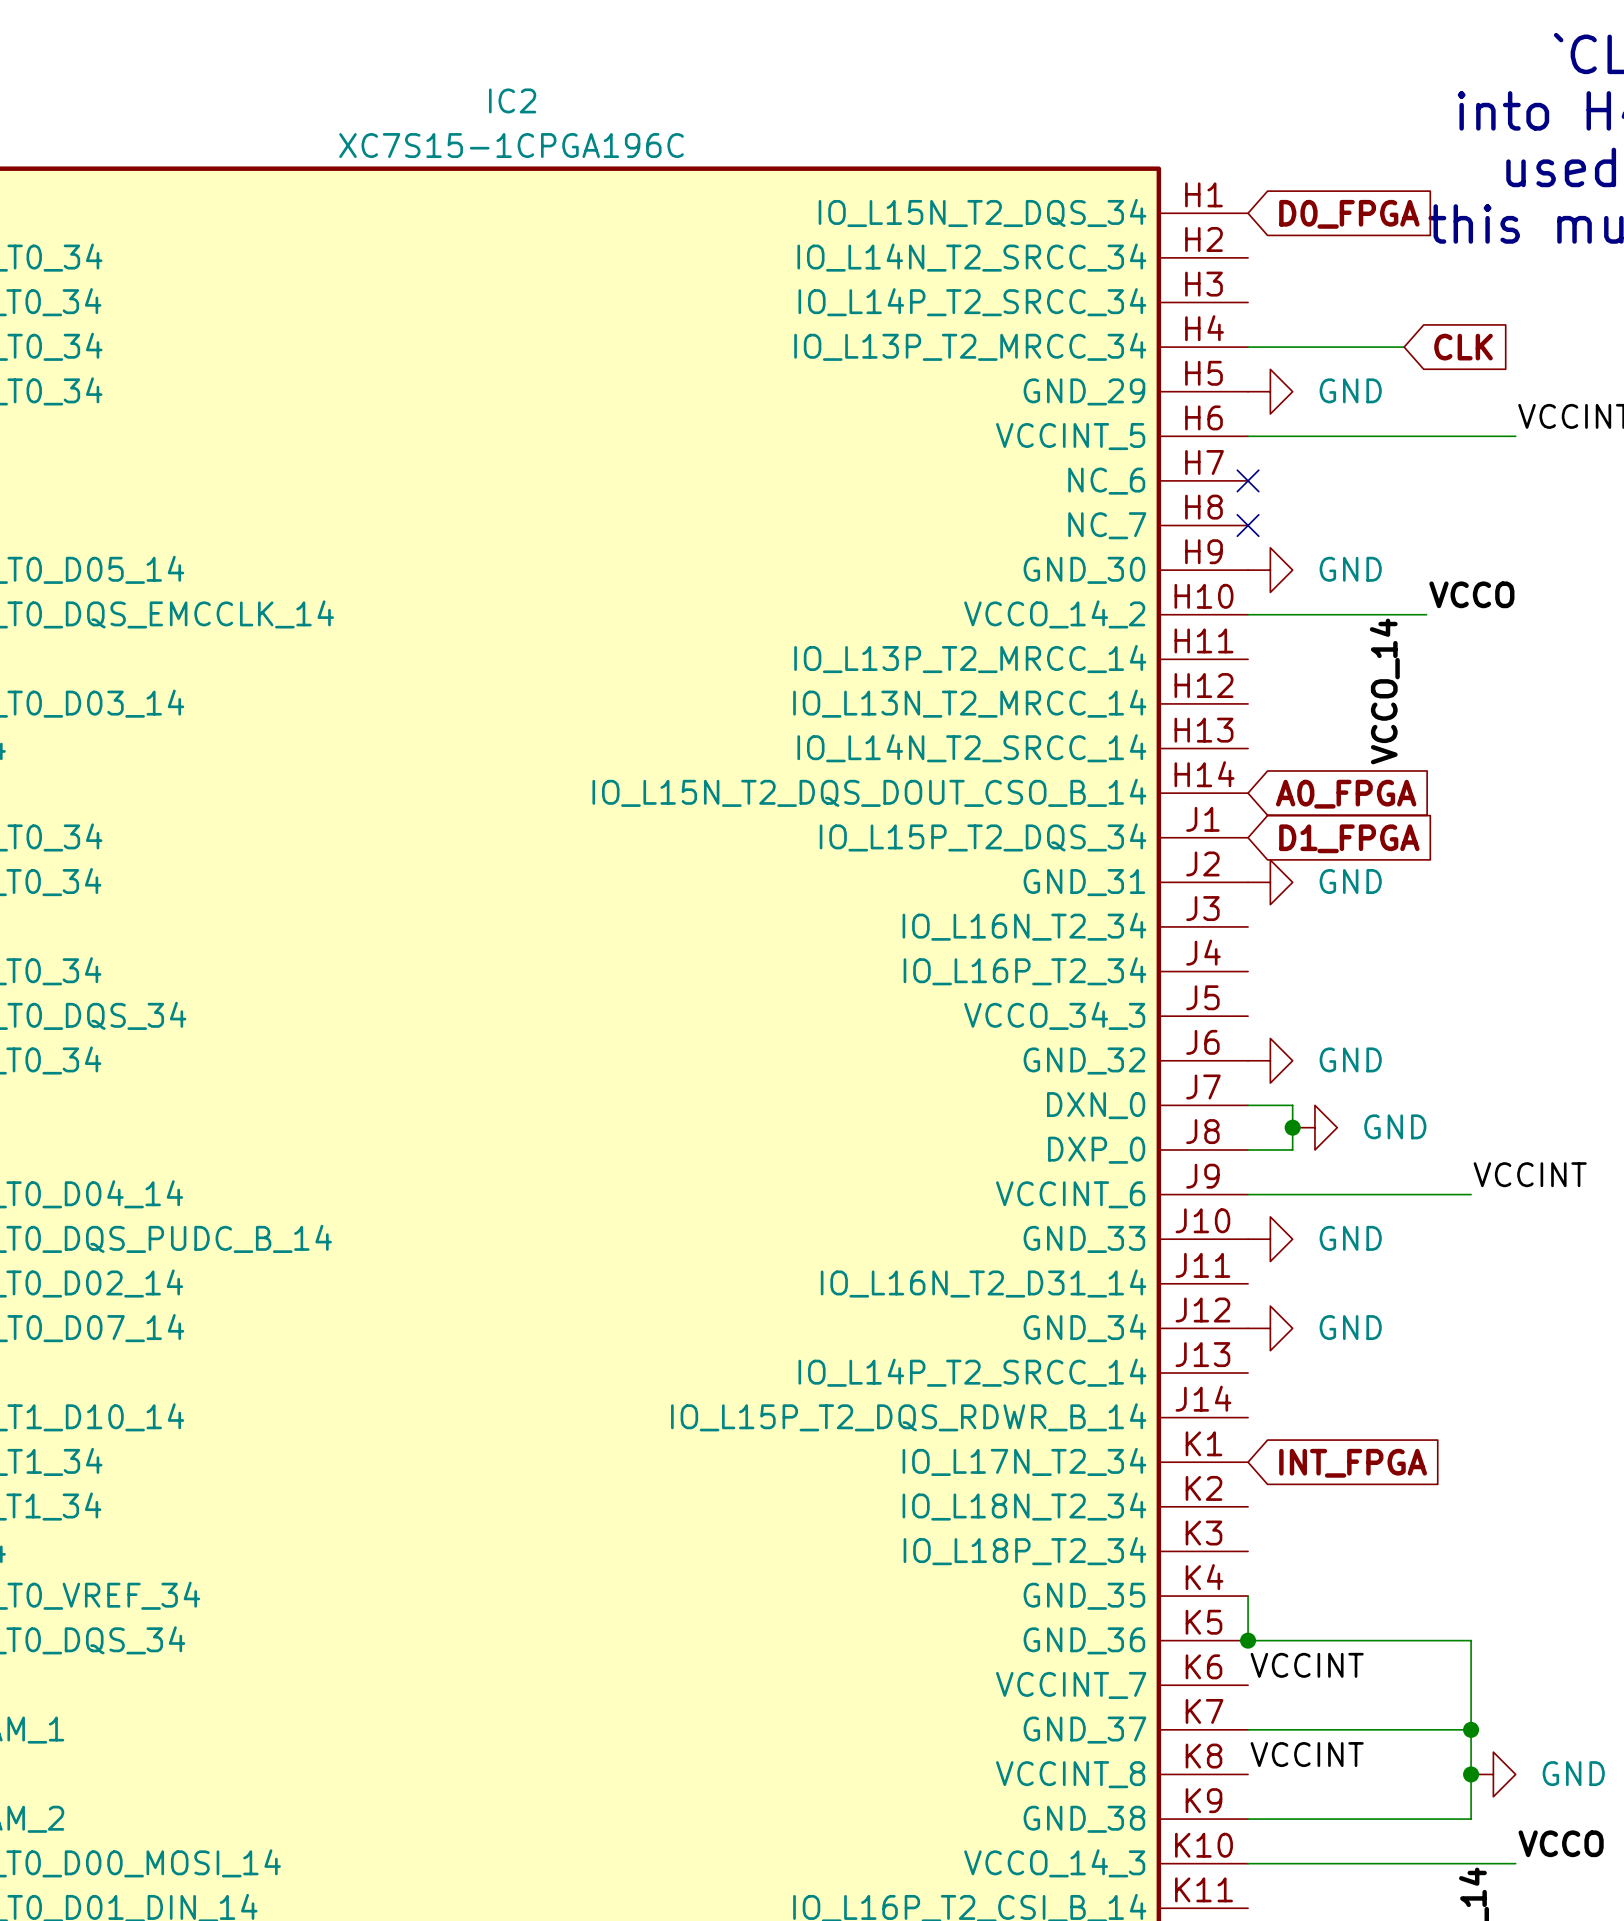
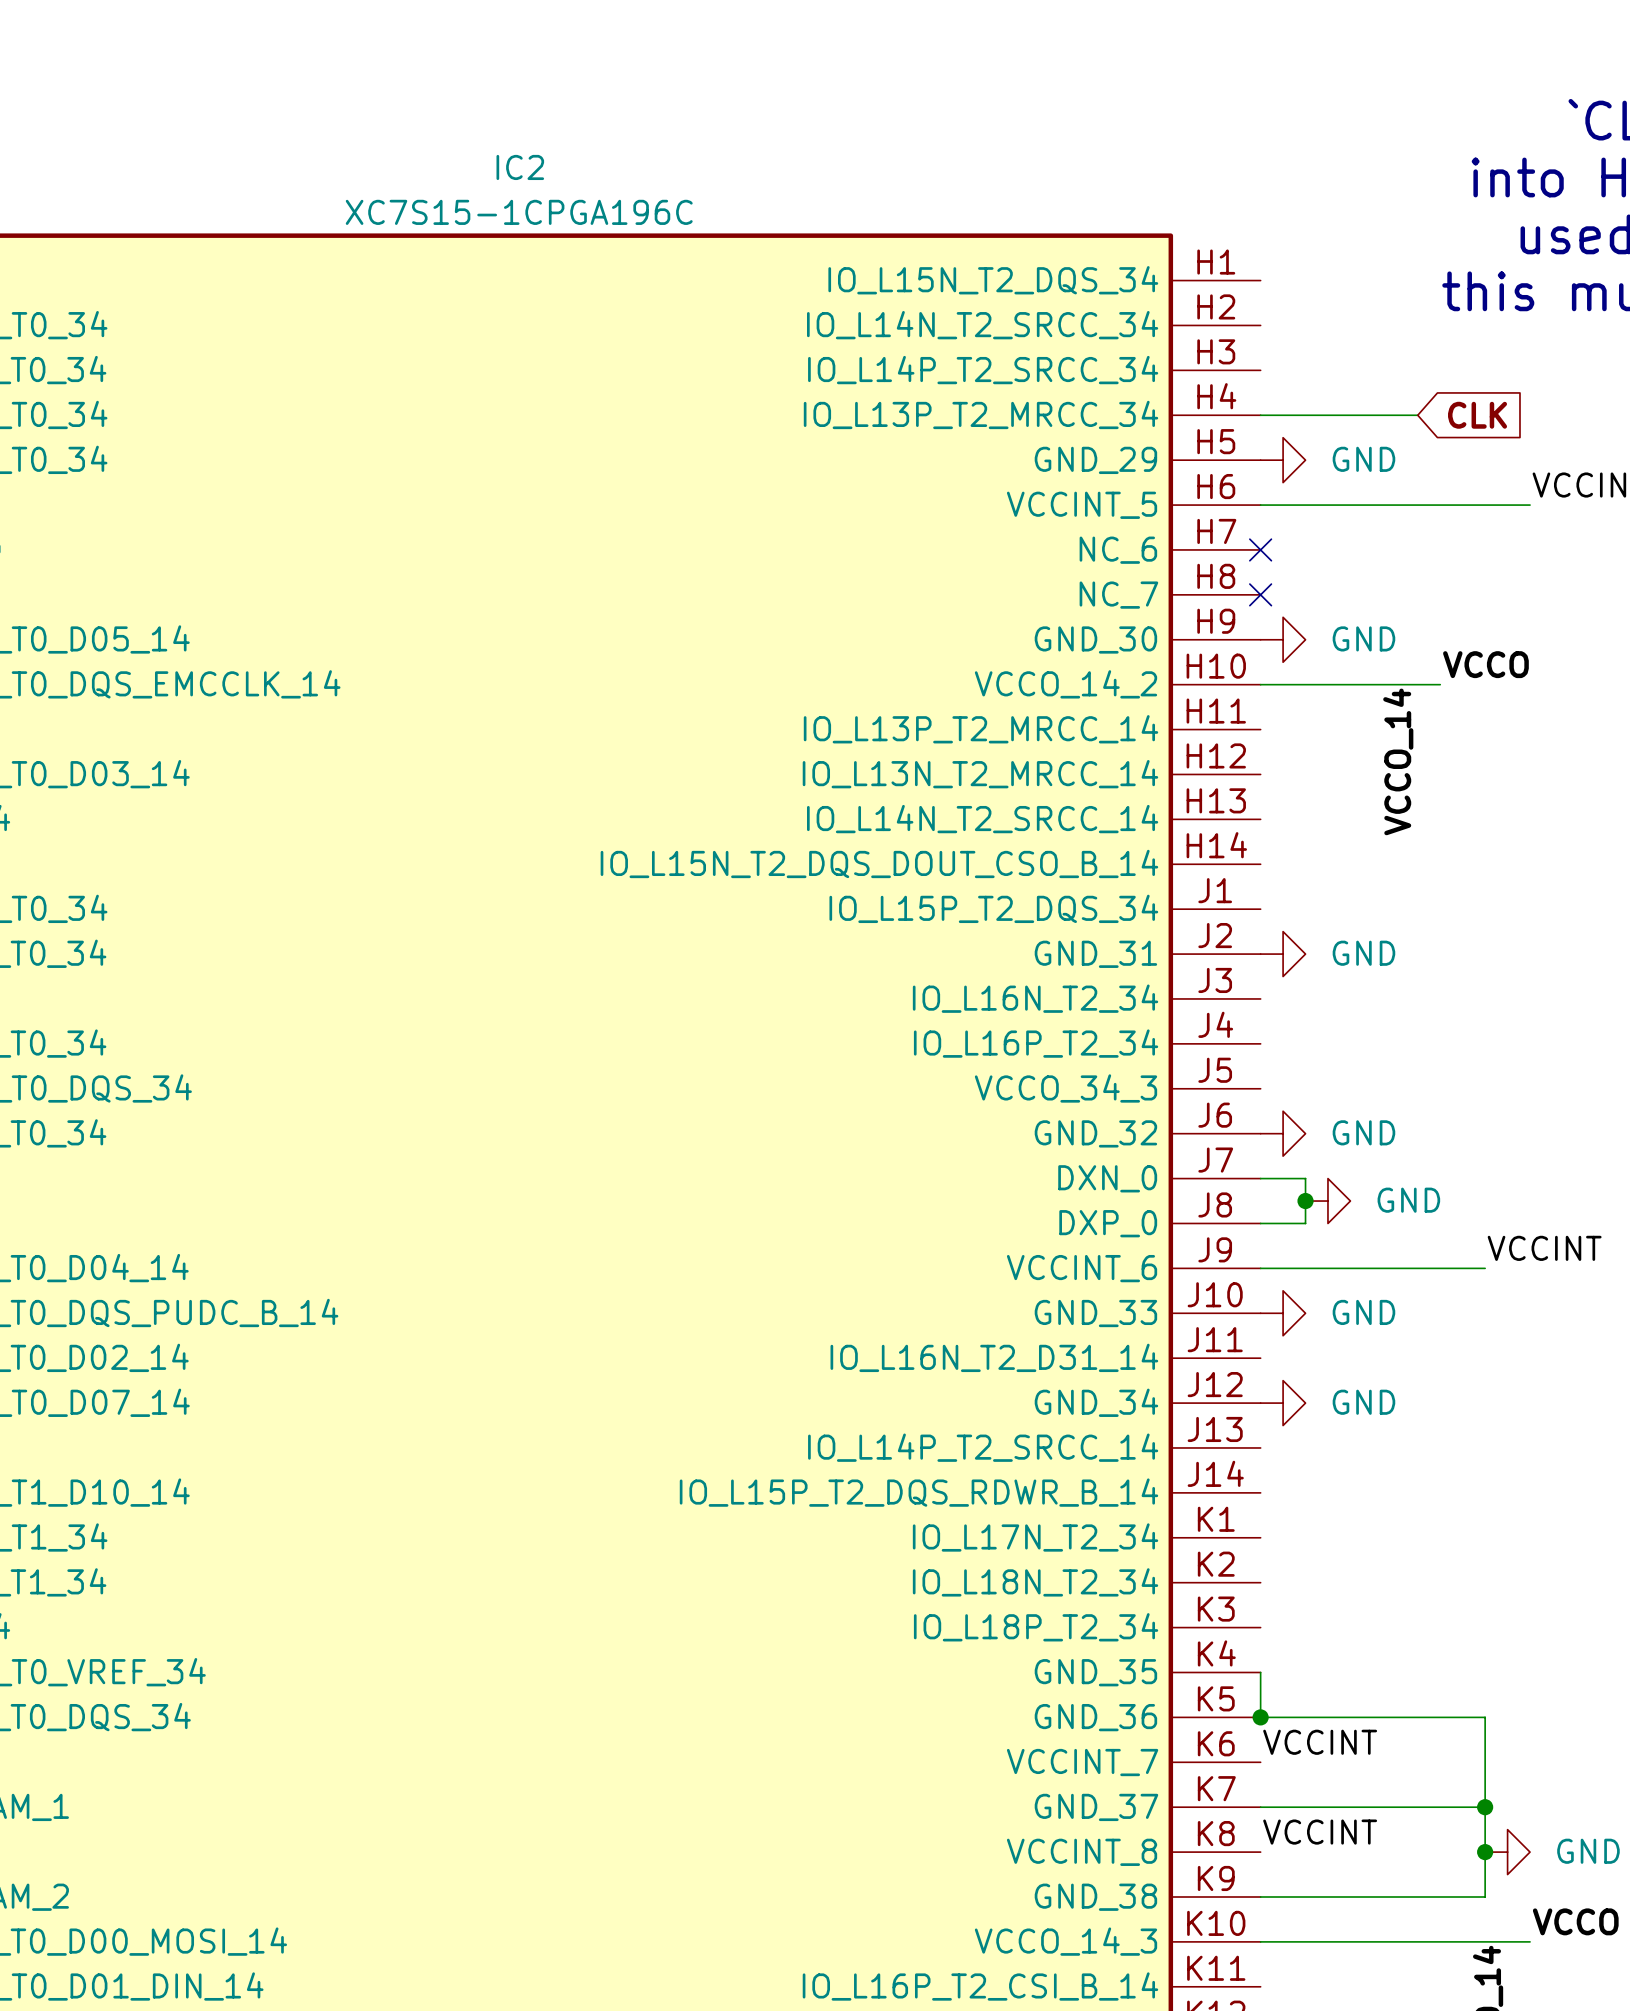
global label: D0_FPGA (1349, 214) -> none
global label: A0_FPGA (1346, 794) -> none
global label: D1_FPGA (1349, 838) -> none
global label: INT_FPGA (1353, 1463) -> none

